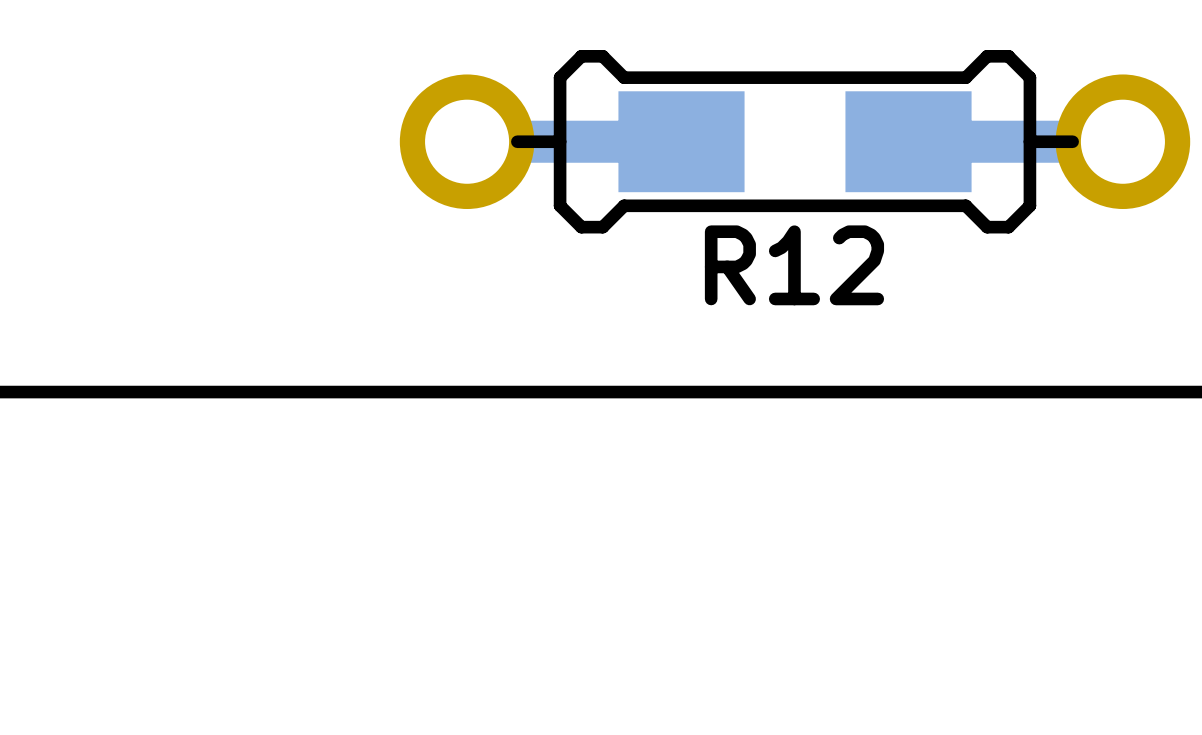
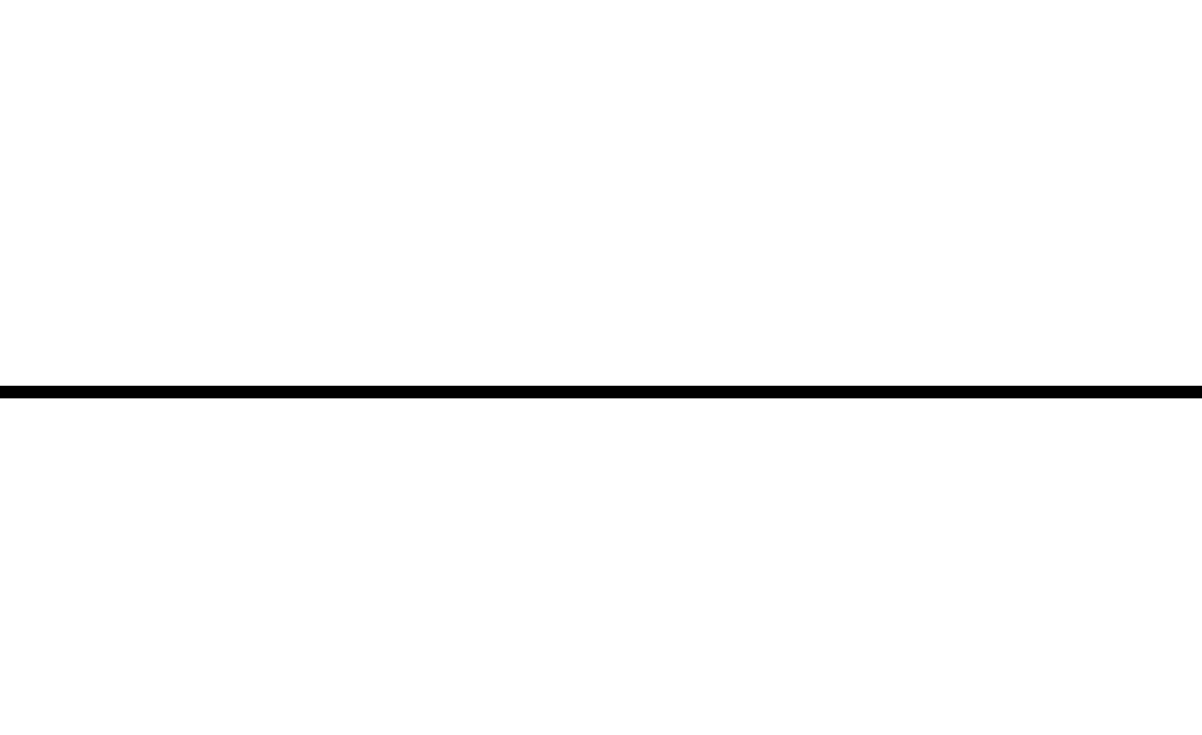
R12: (795, 141) -> none

